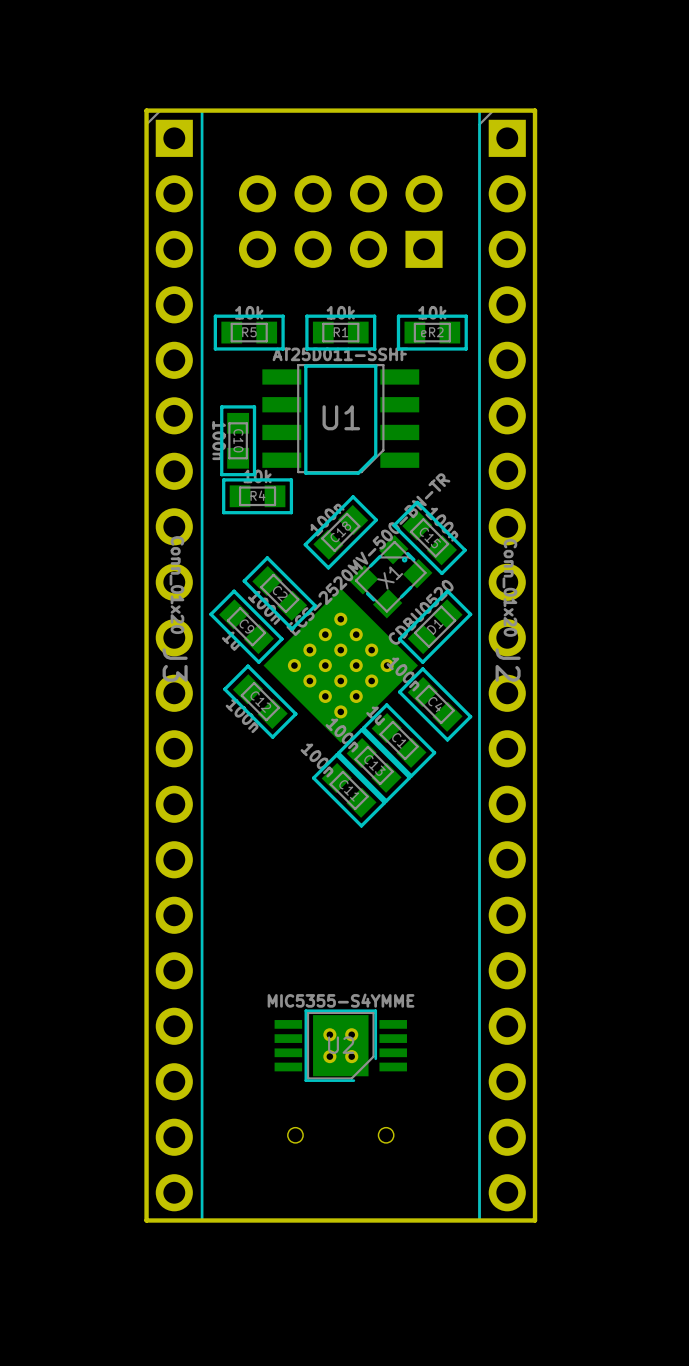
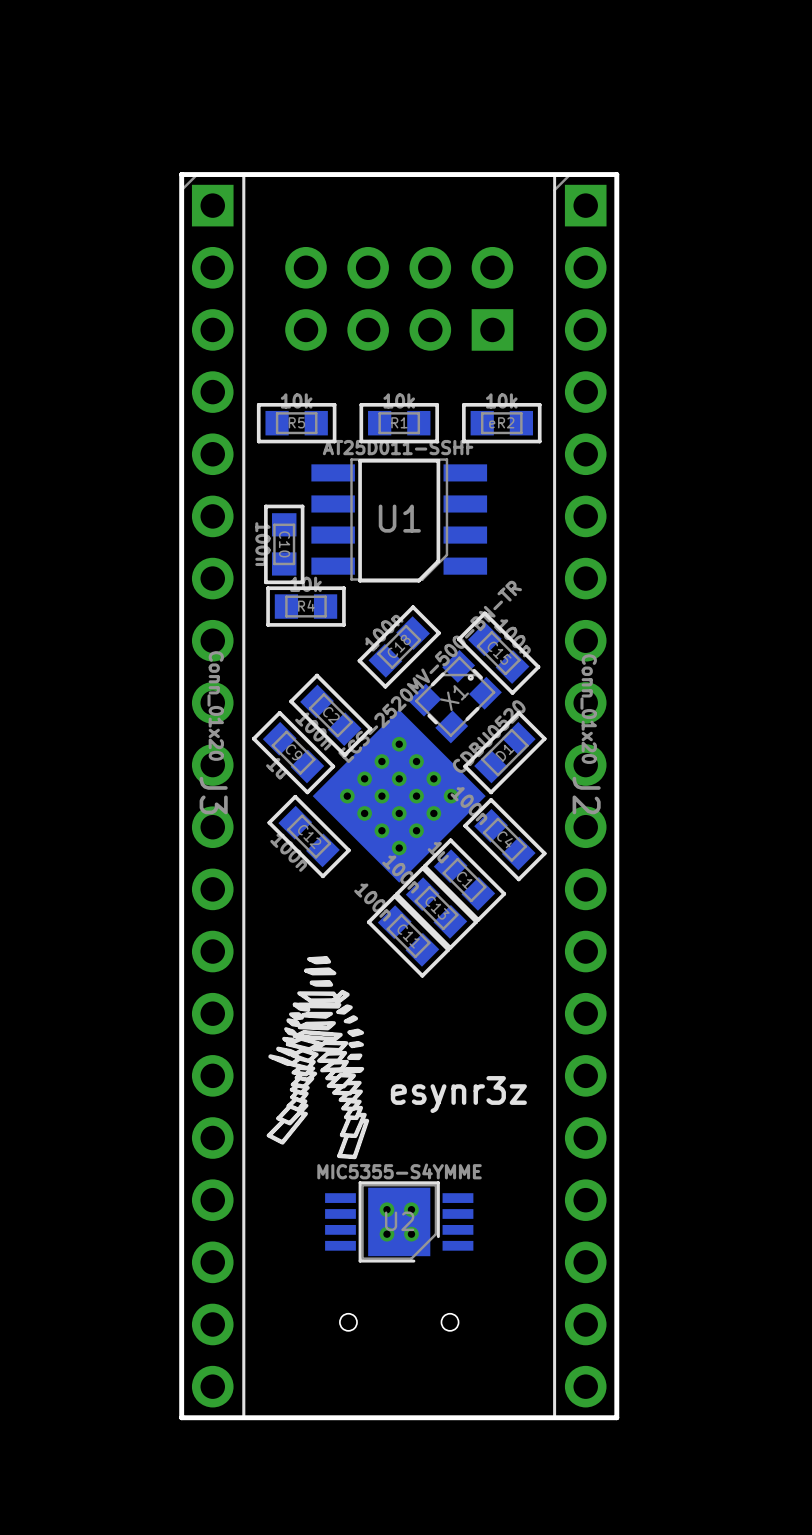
drawing: none -> [266, 956, 370, 1160]
text: none -> esynr3z (458, 1094)

